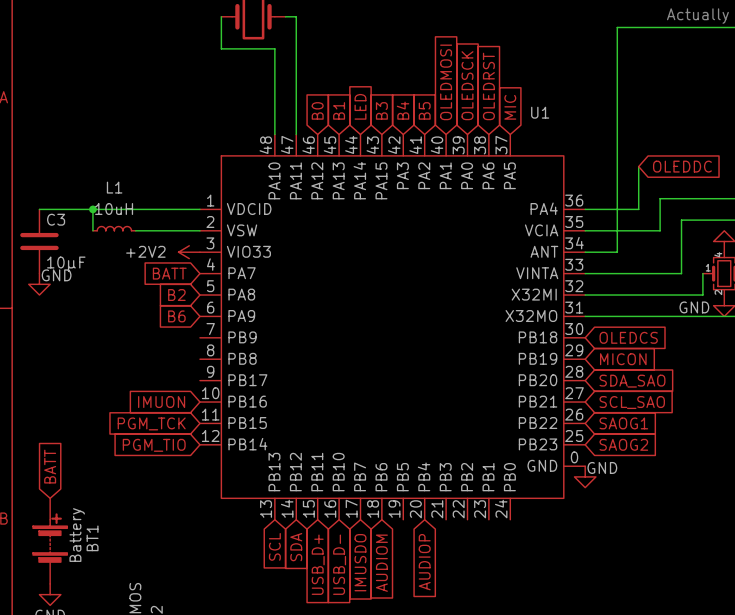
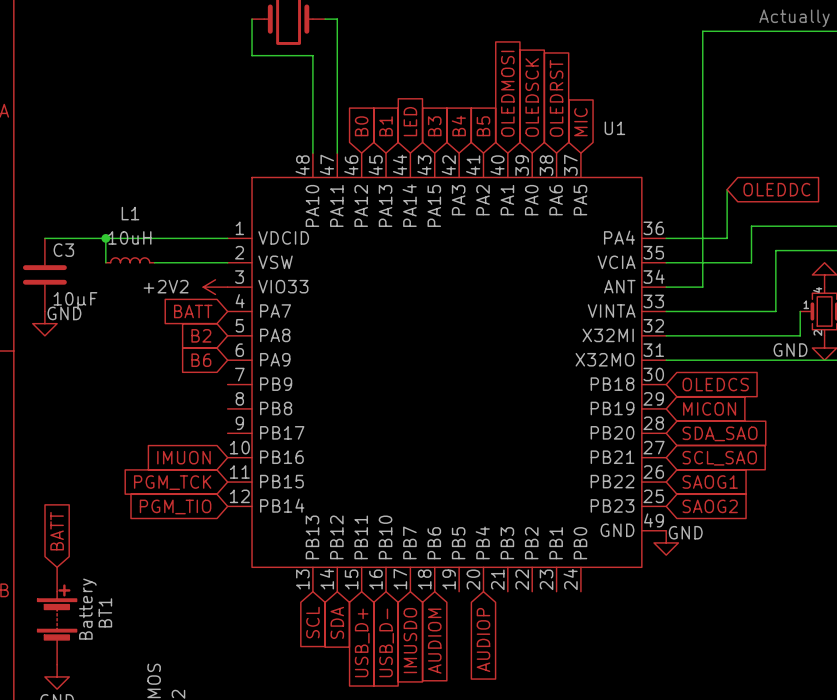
U1 pin number: 0 (574, 457) -> 49 (654, 520)

